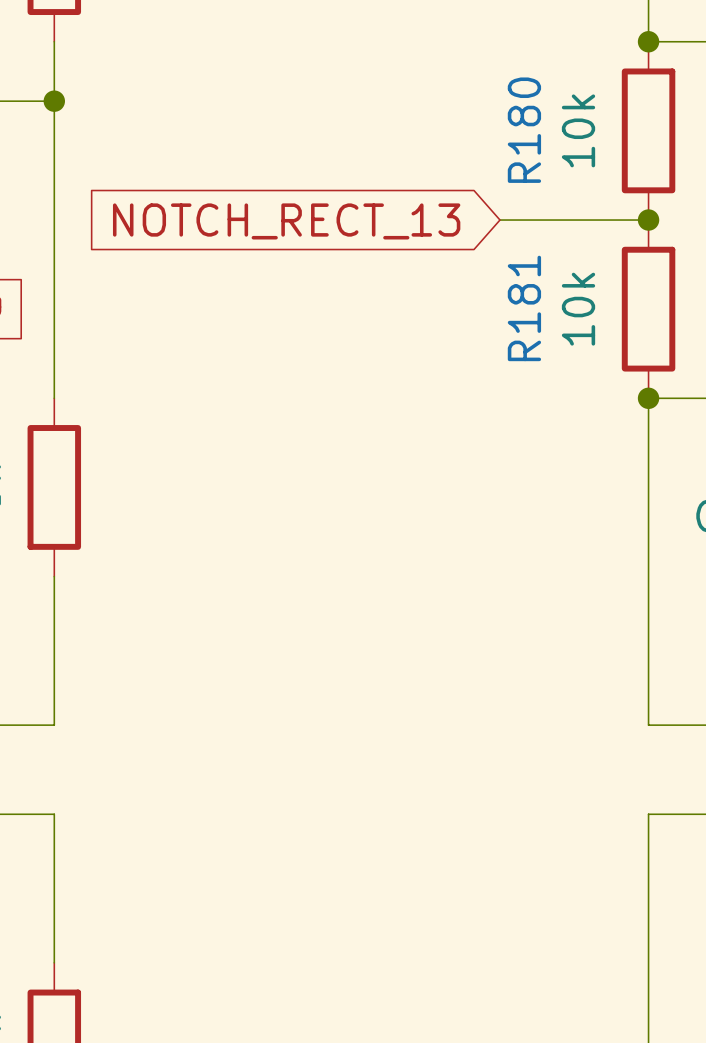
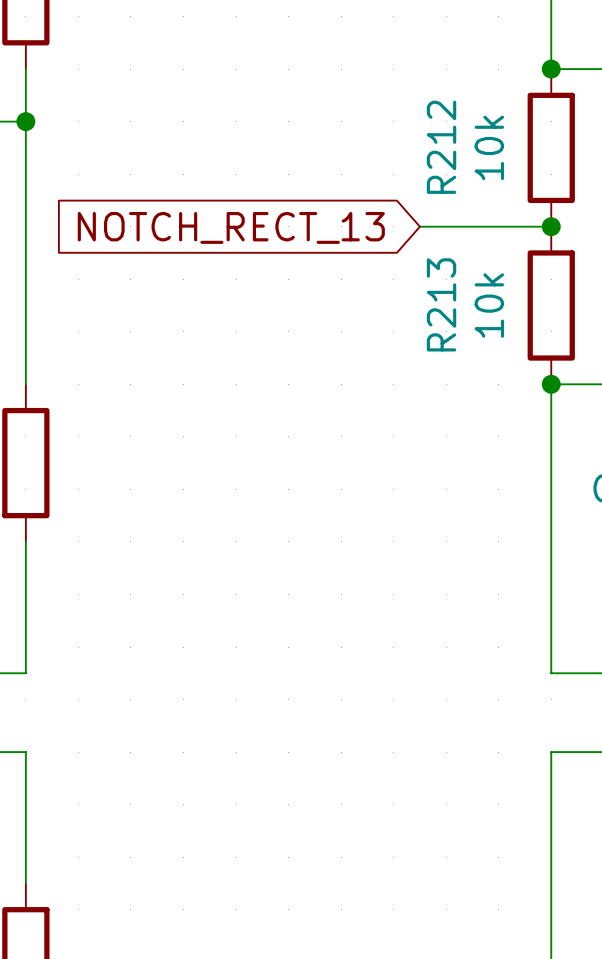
R180 name: R180 (524, 130) -> R212 (441, 147)
R181 name: R181 (524, 308) -> R213 (441, 304)

